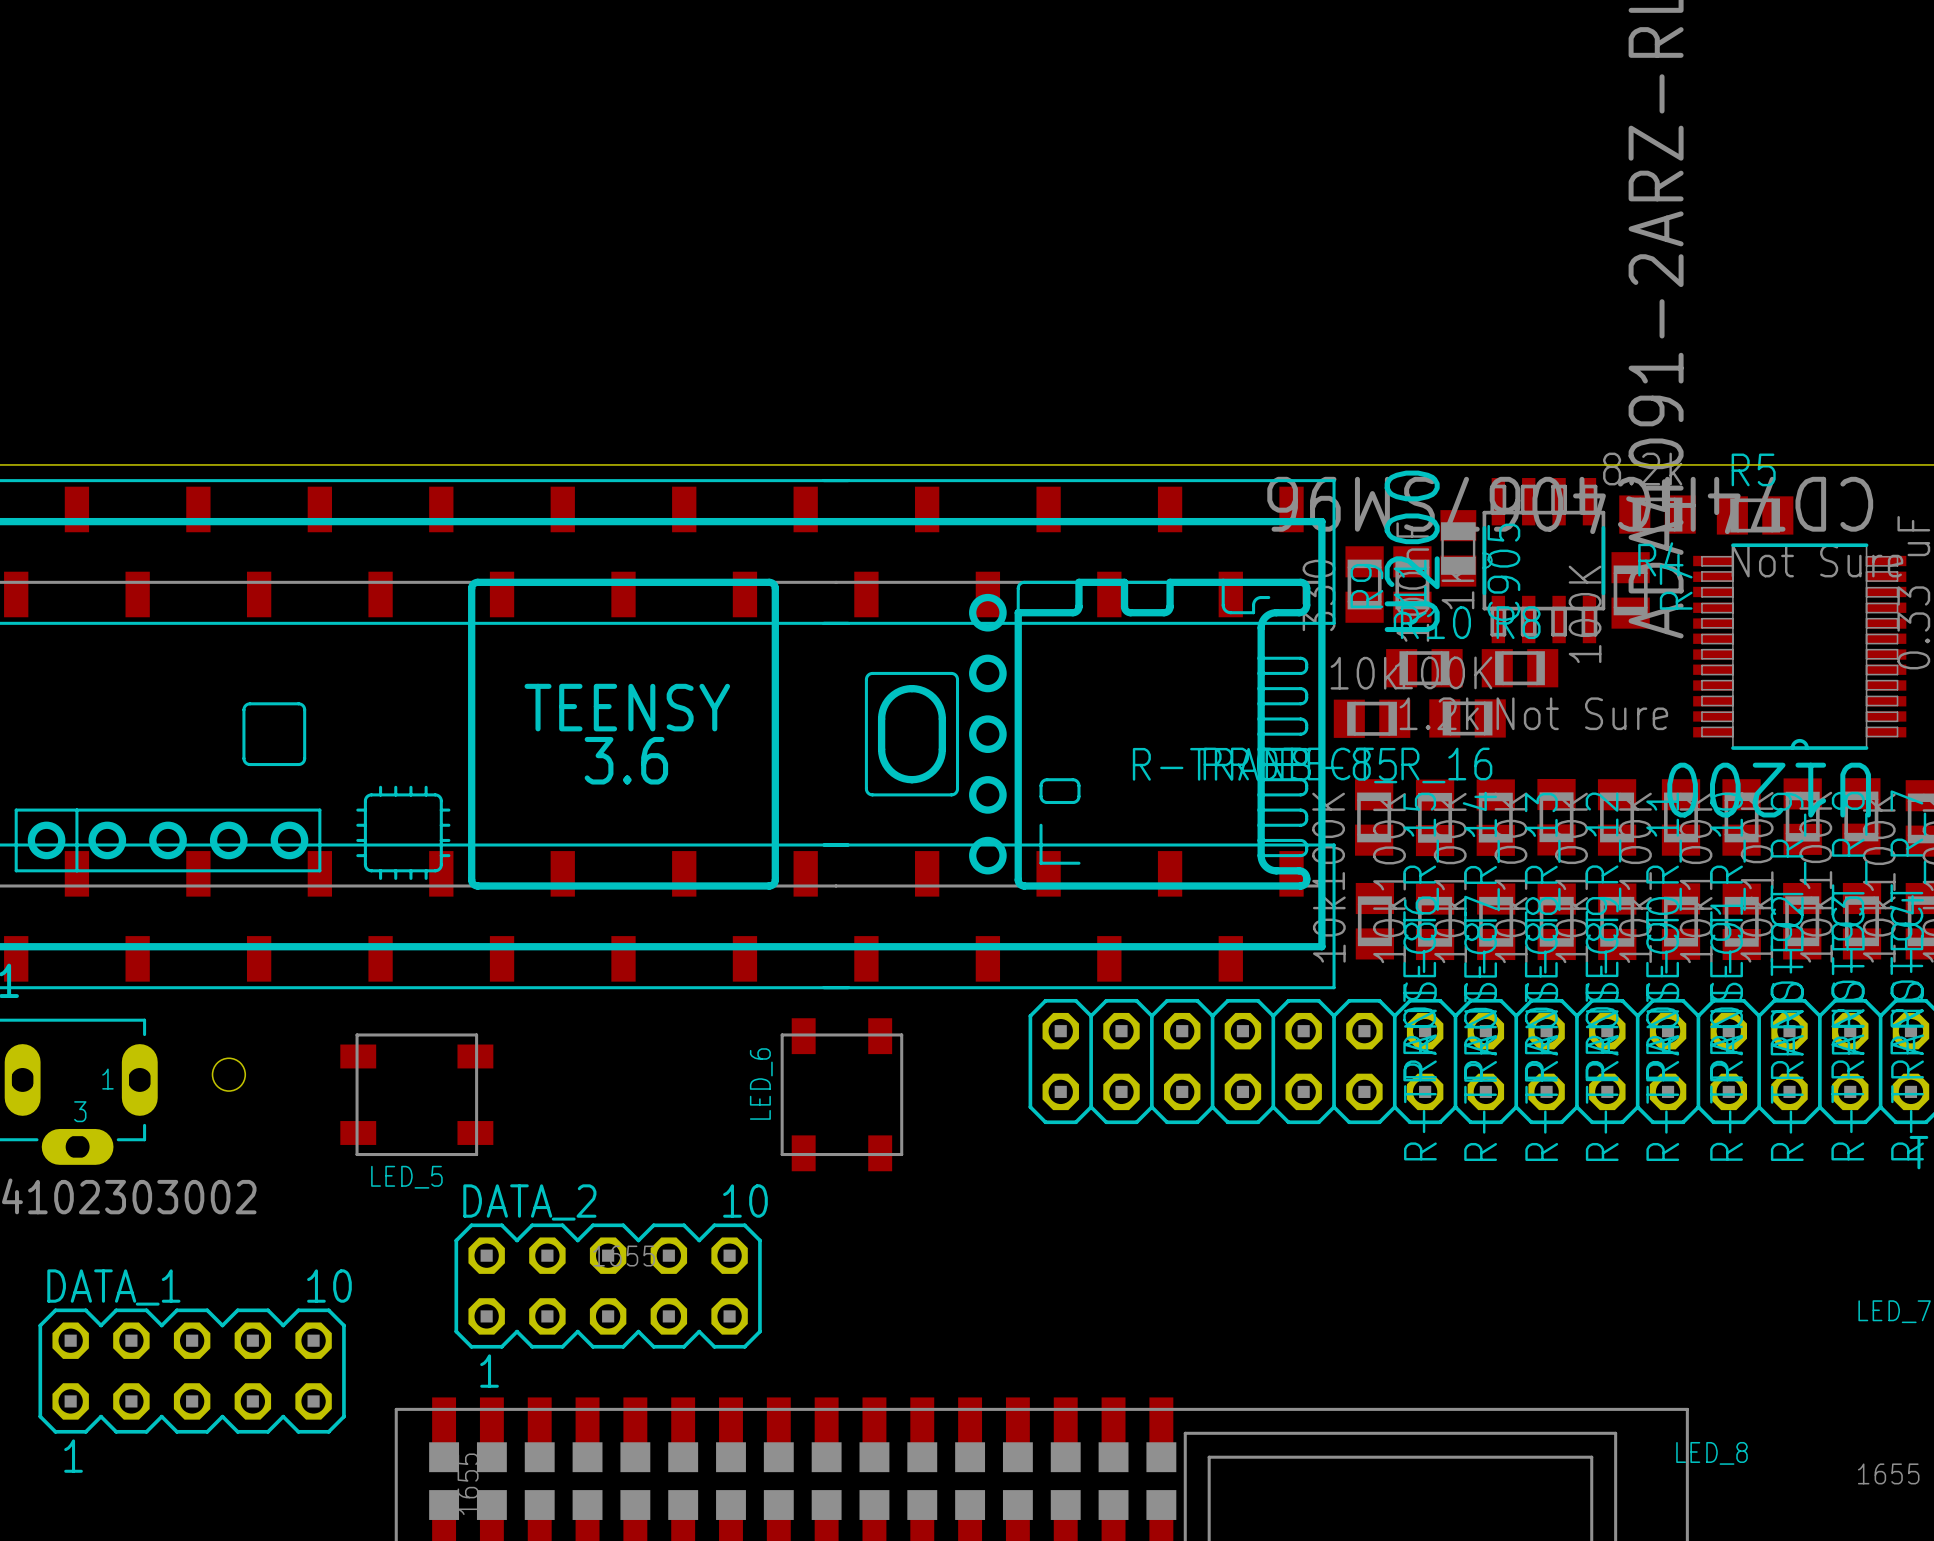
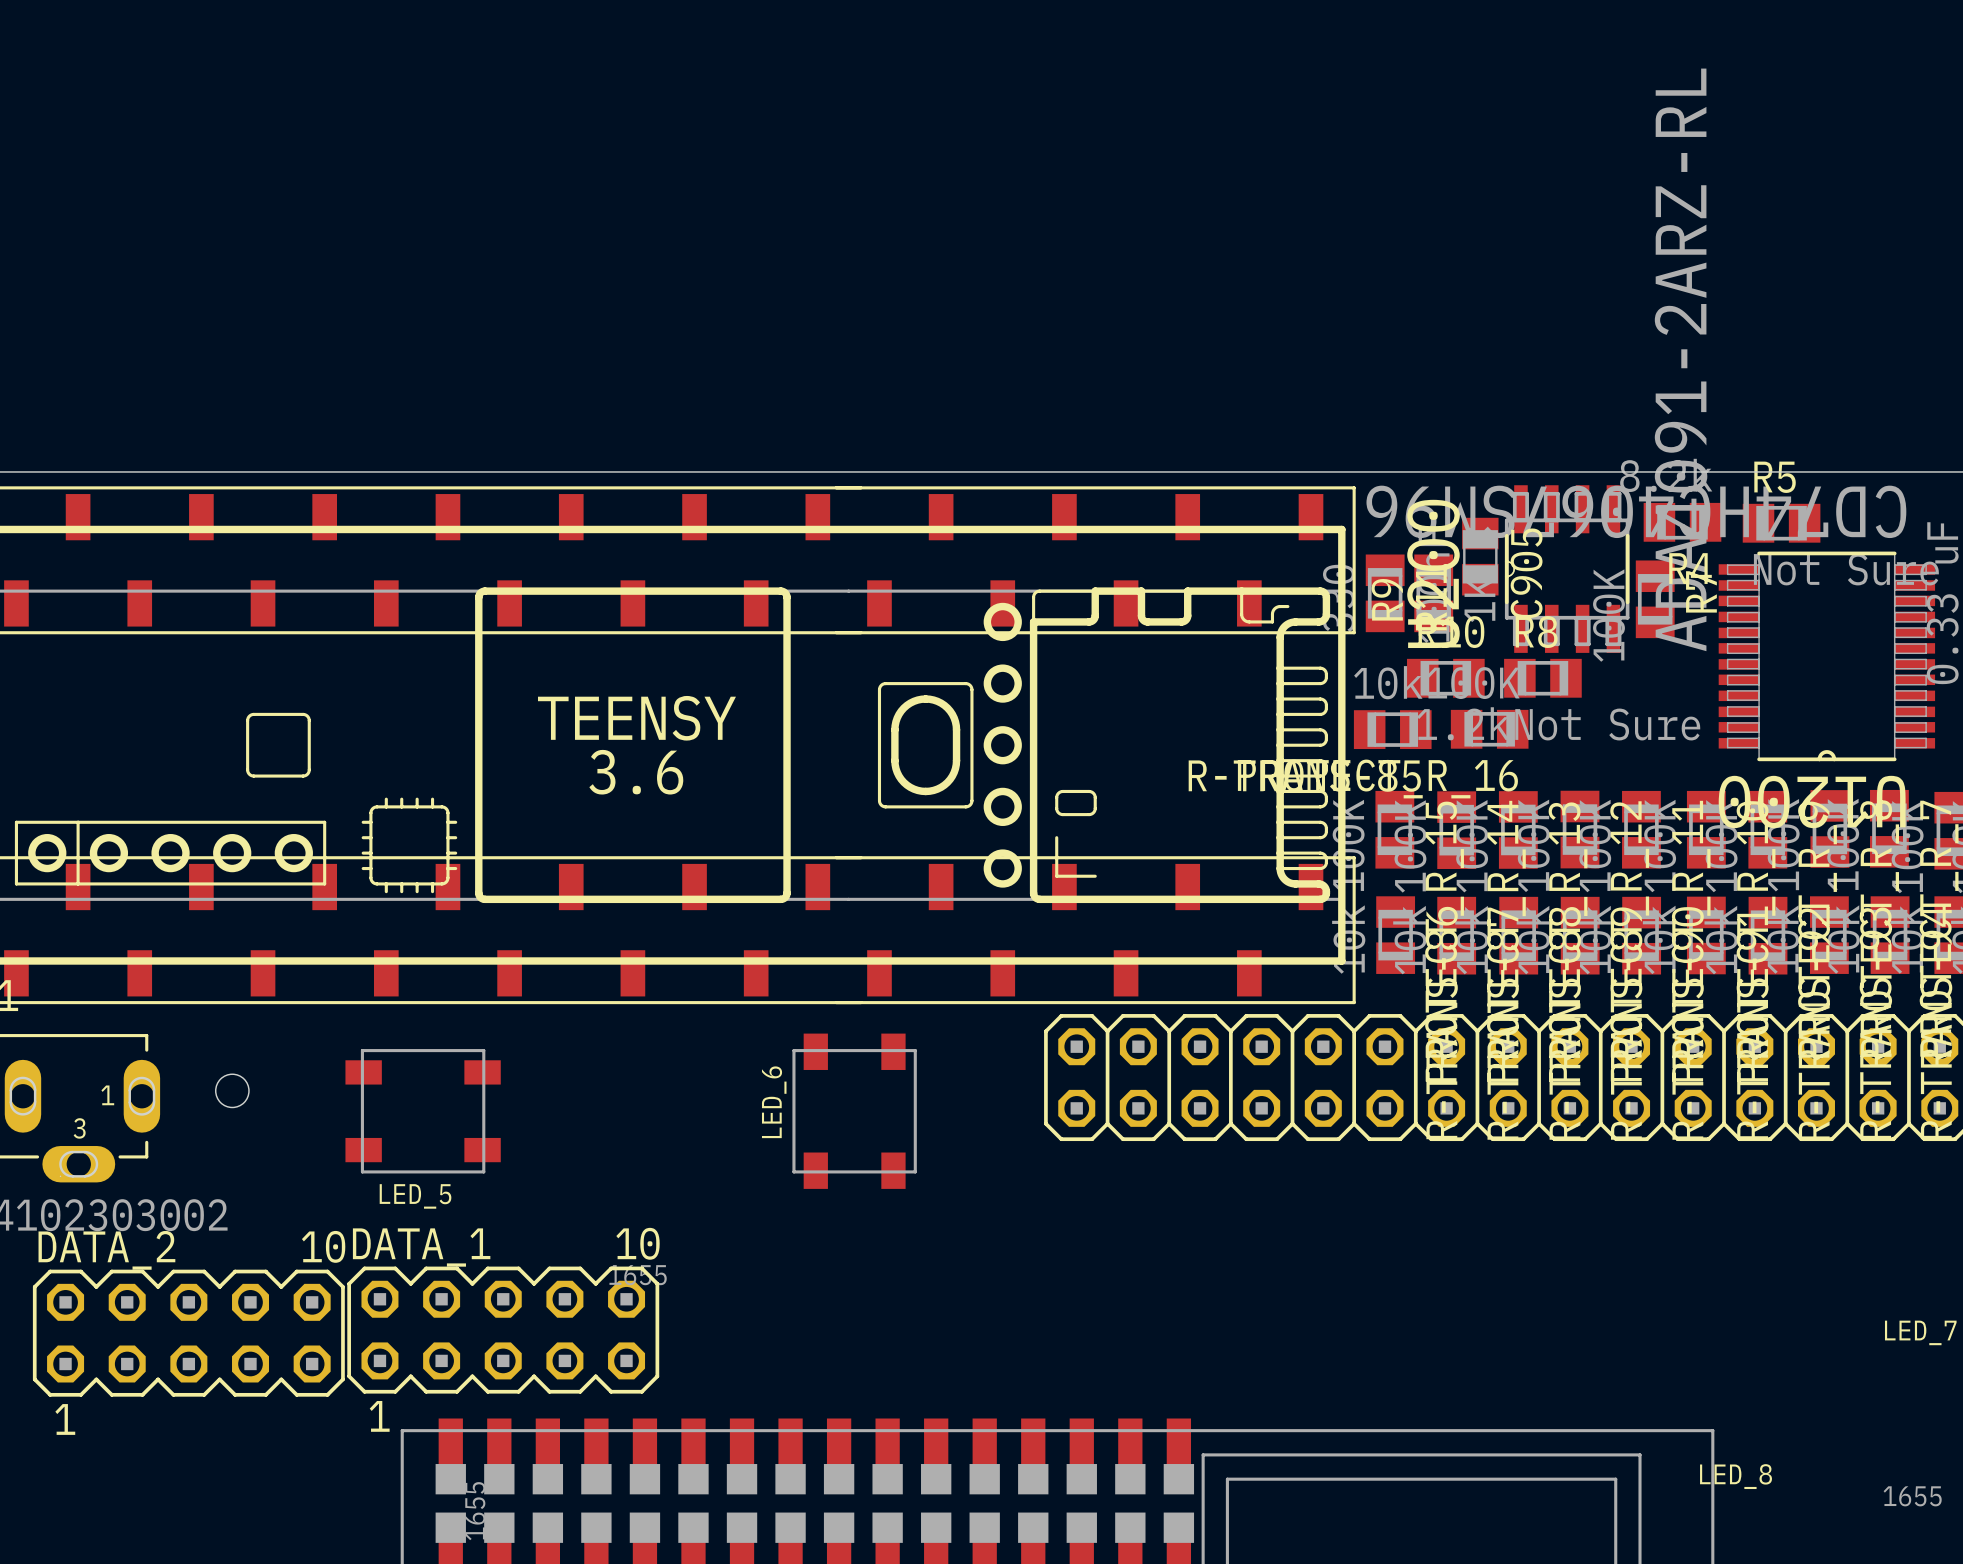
DATA_2 position: (608, 1286) -> (188, 1333)
DATA_1 position: (192, 1371) -> (503, 1330)

